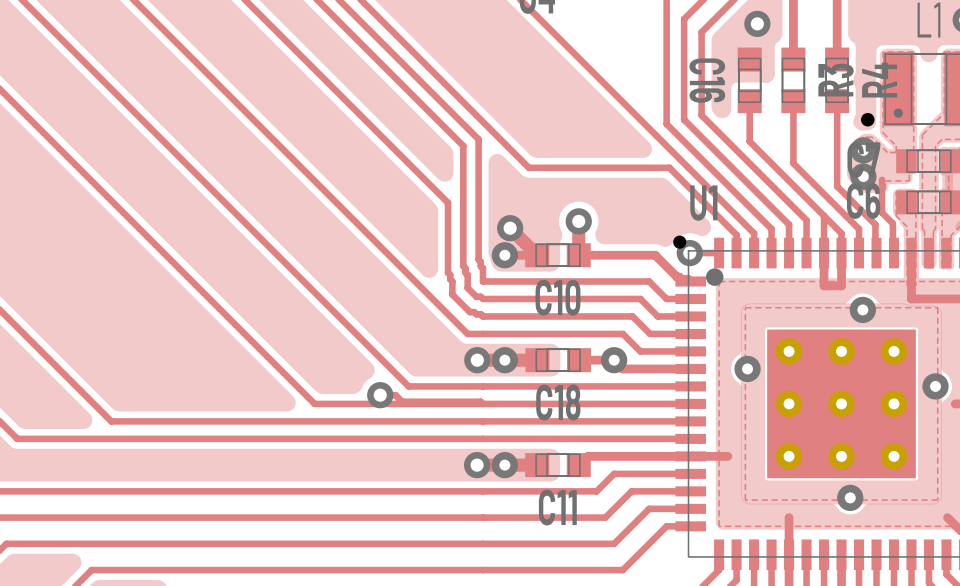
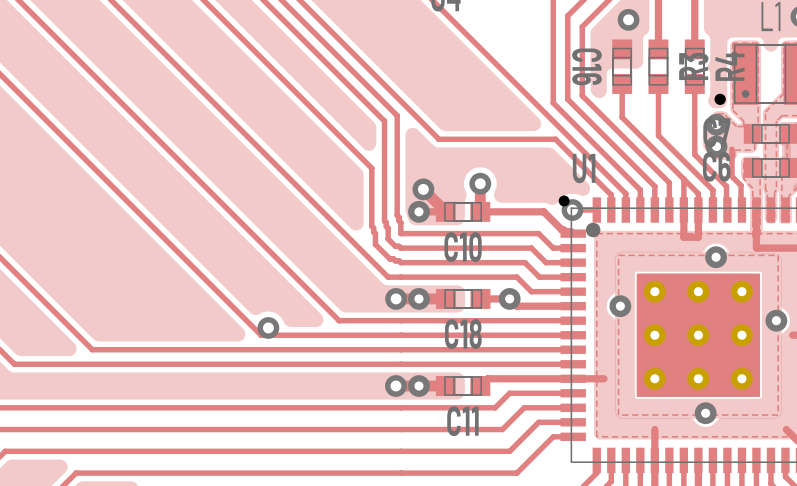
track: (380, 395) (395, 395) (402, 401) (480, 401) (482, 403) -> none
via position: (380, 395) -> (268, 327)

